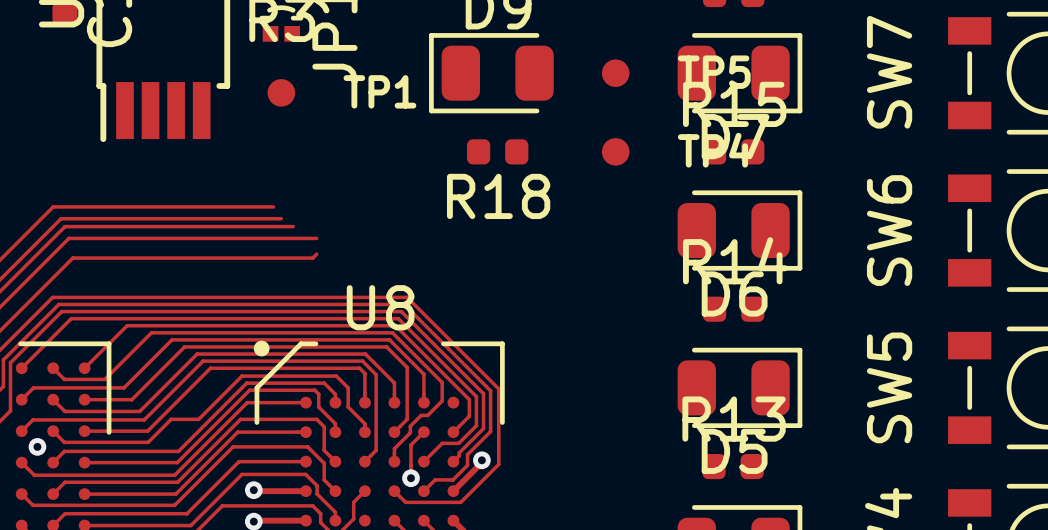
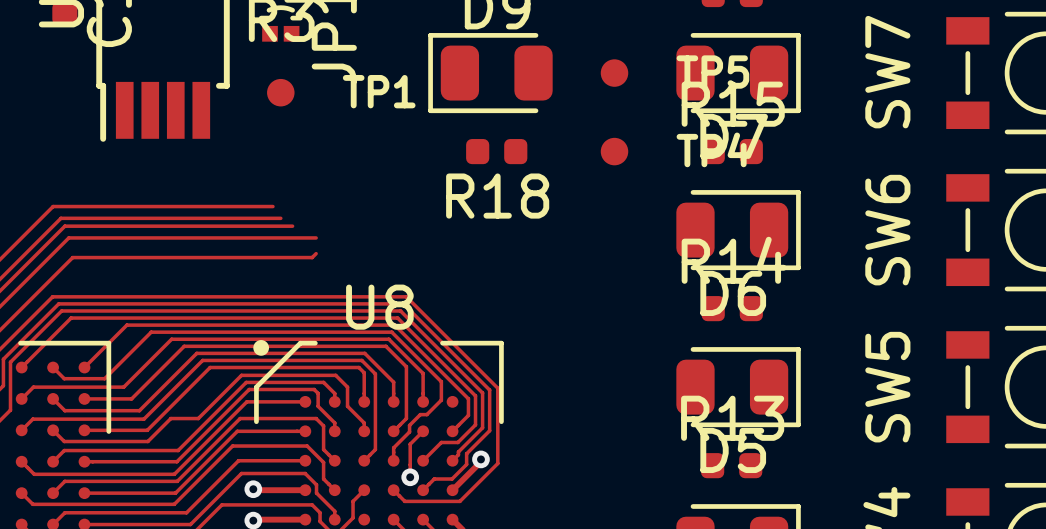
via: (37, 446) -> none

